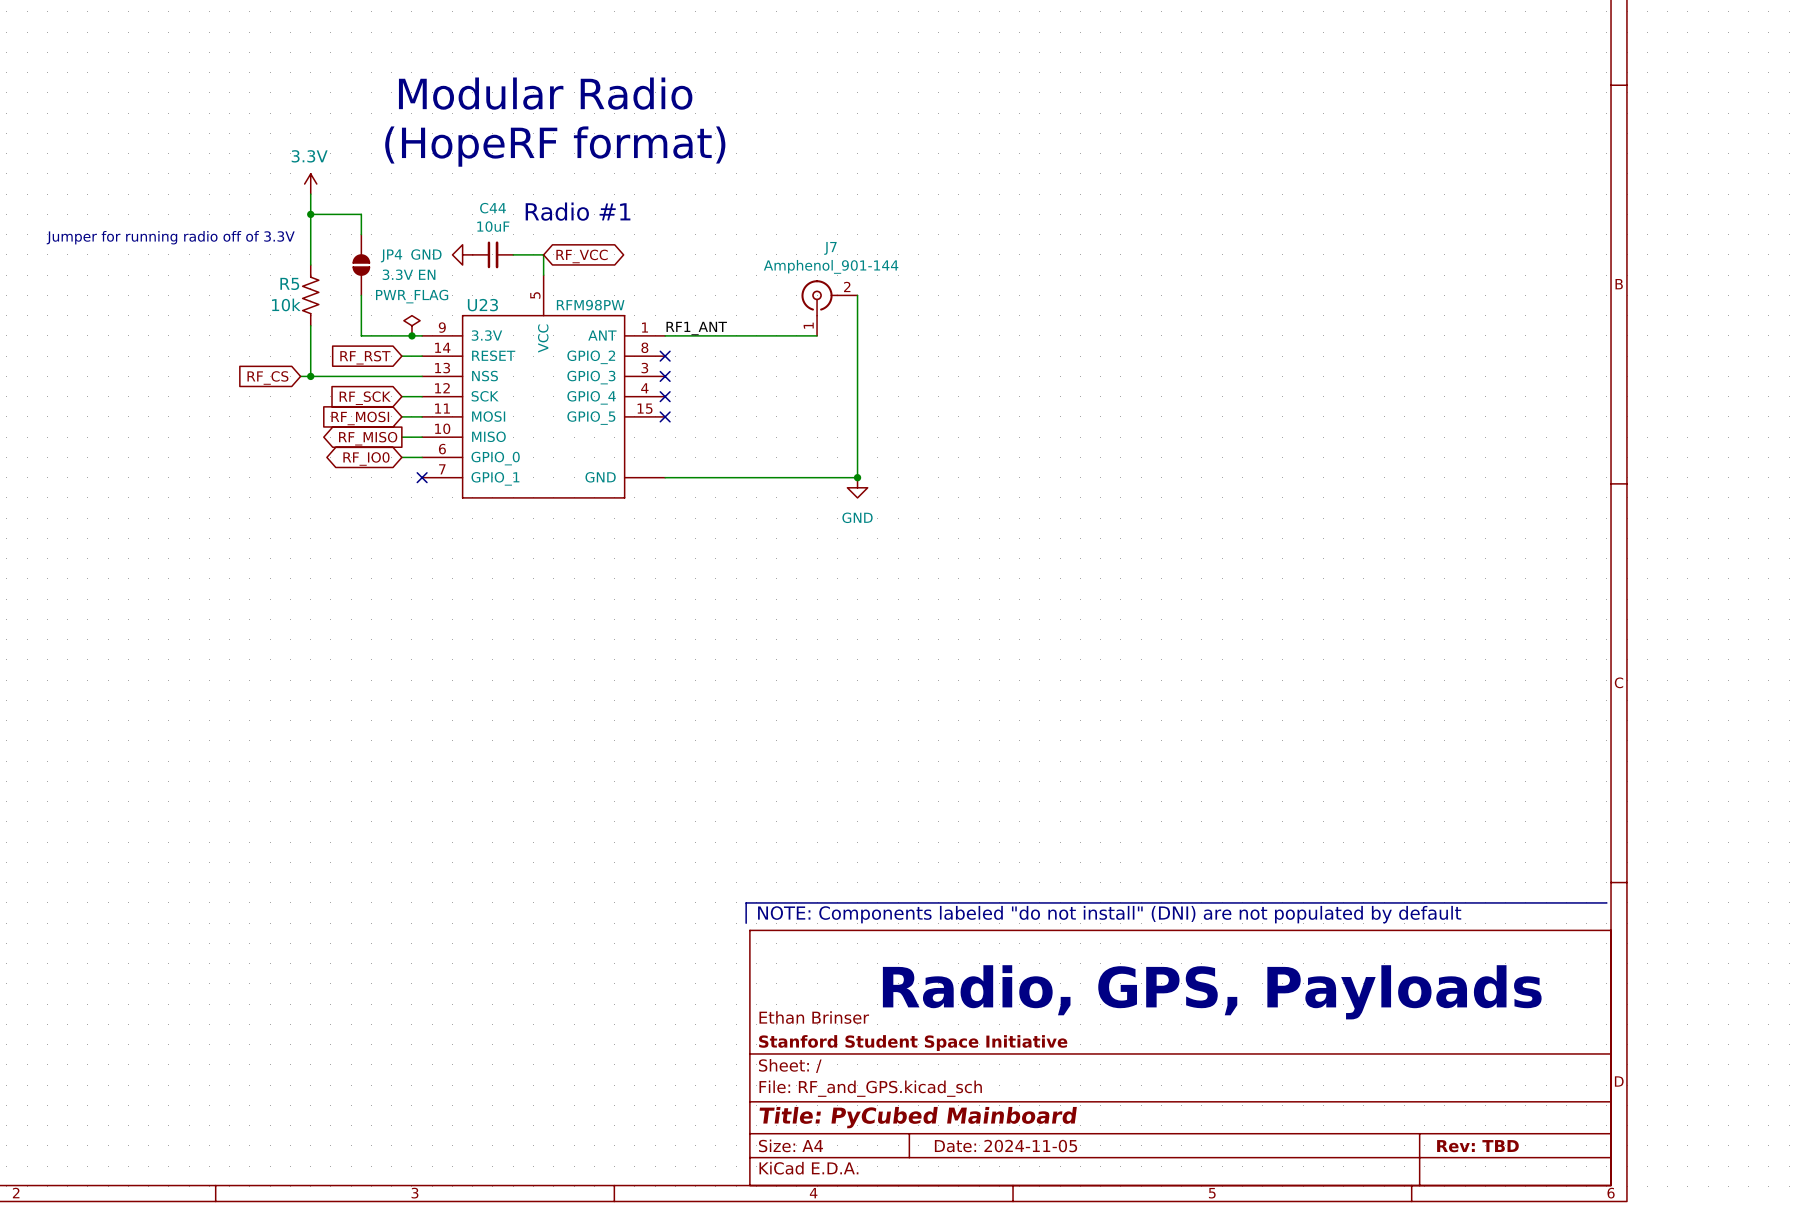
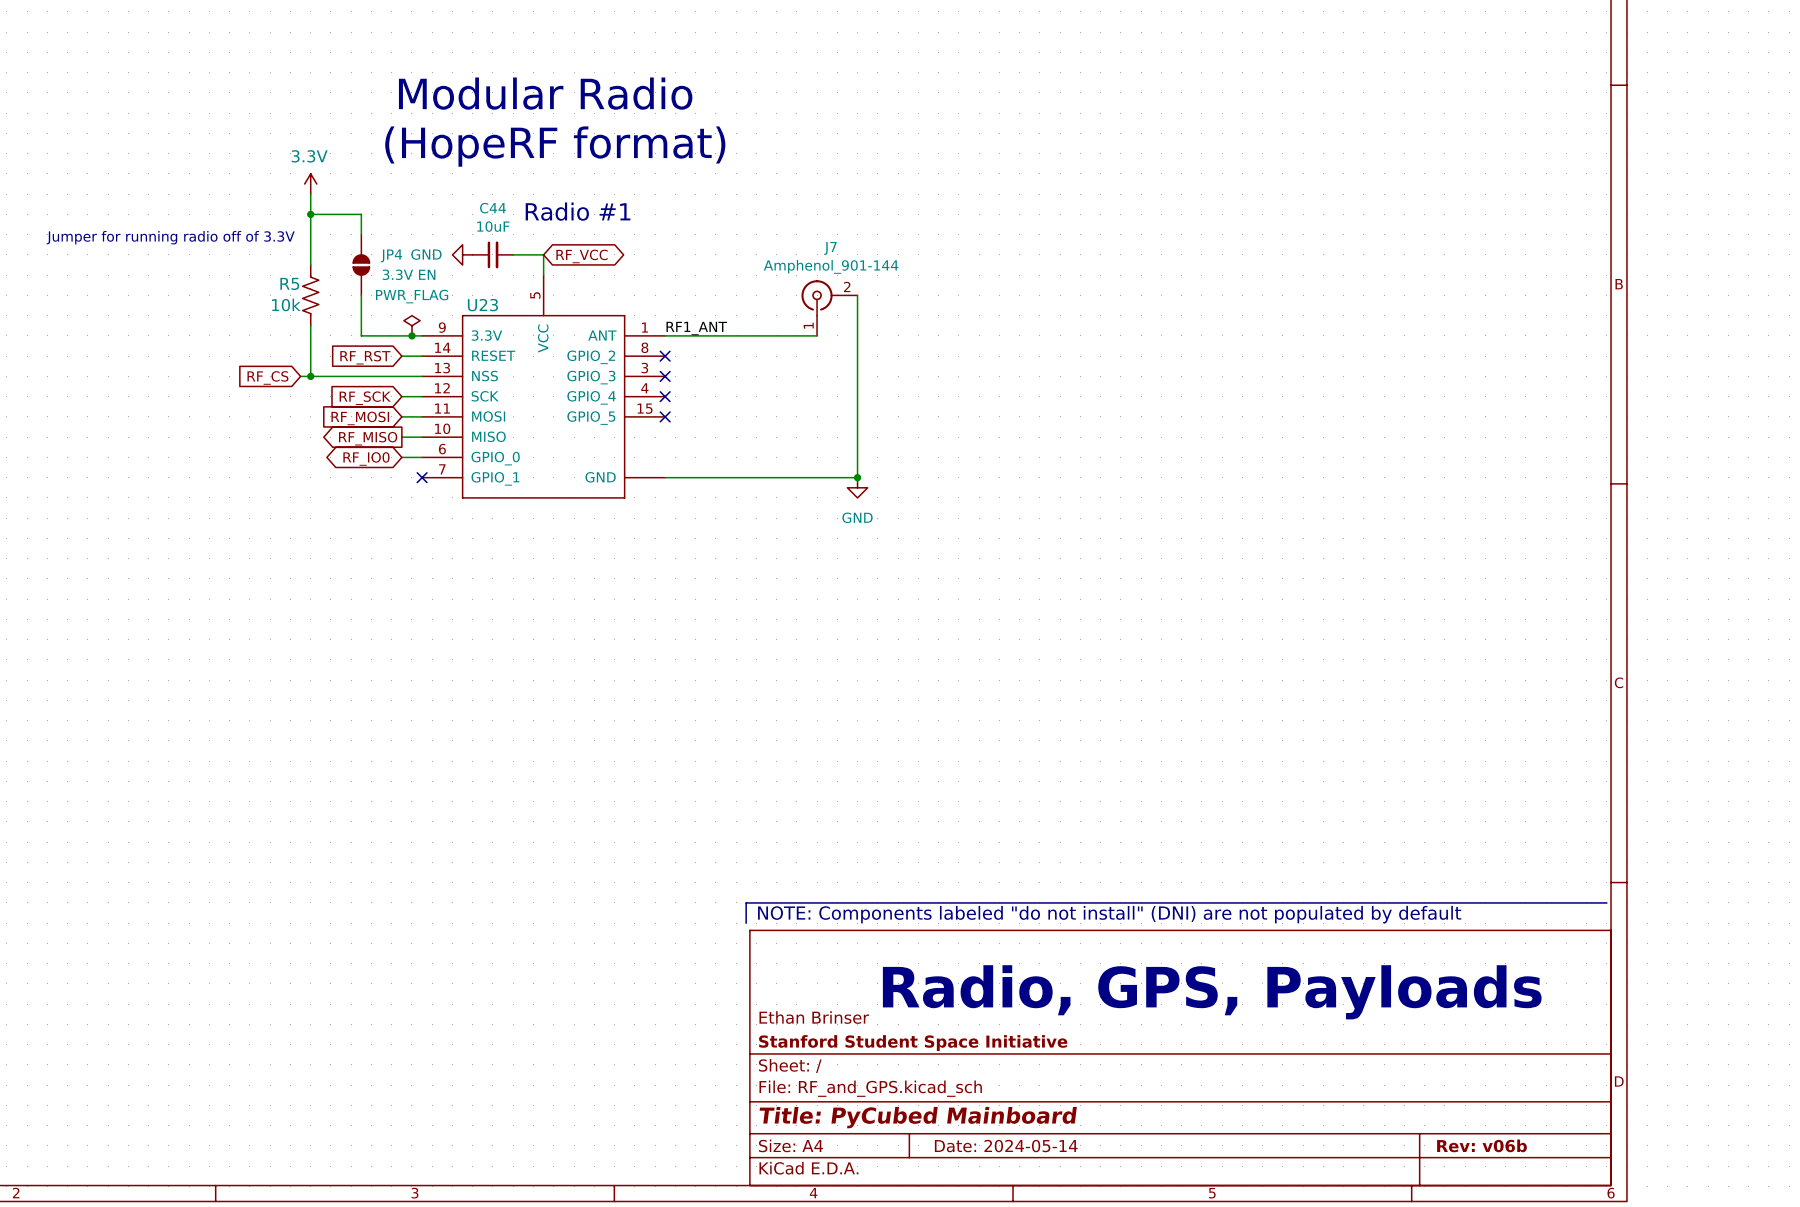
U23 value: RFM98PW (590, 305) -> none
title block: Date: 2024-11-05 (1006, 1146) -> Date: 2024-05-14 (1006, 1146)
title block: Rev: TBD (1477, 1146) -> Rev: v06b (1481, 1145)

